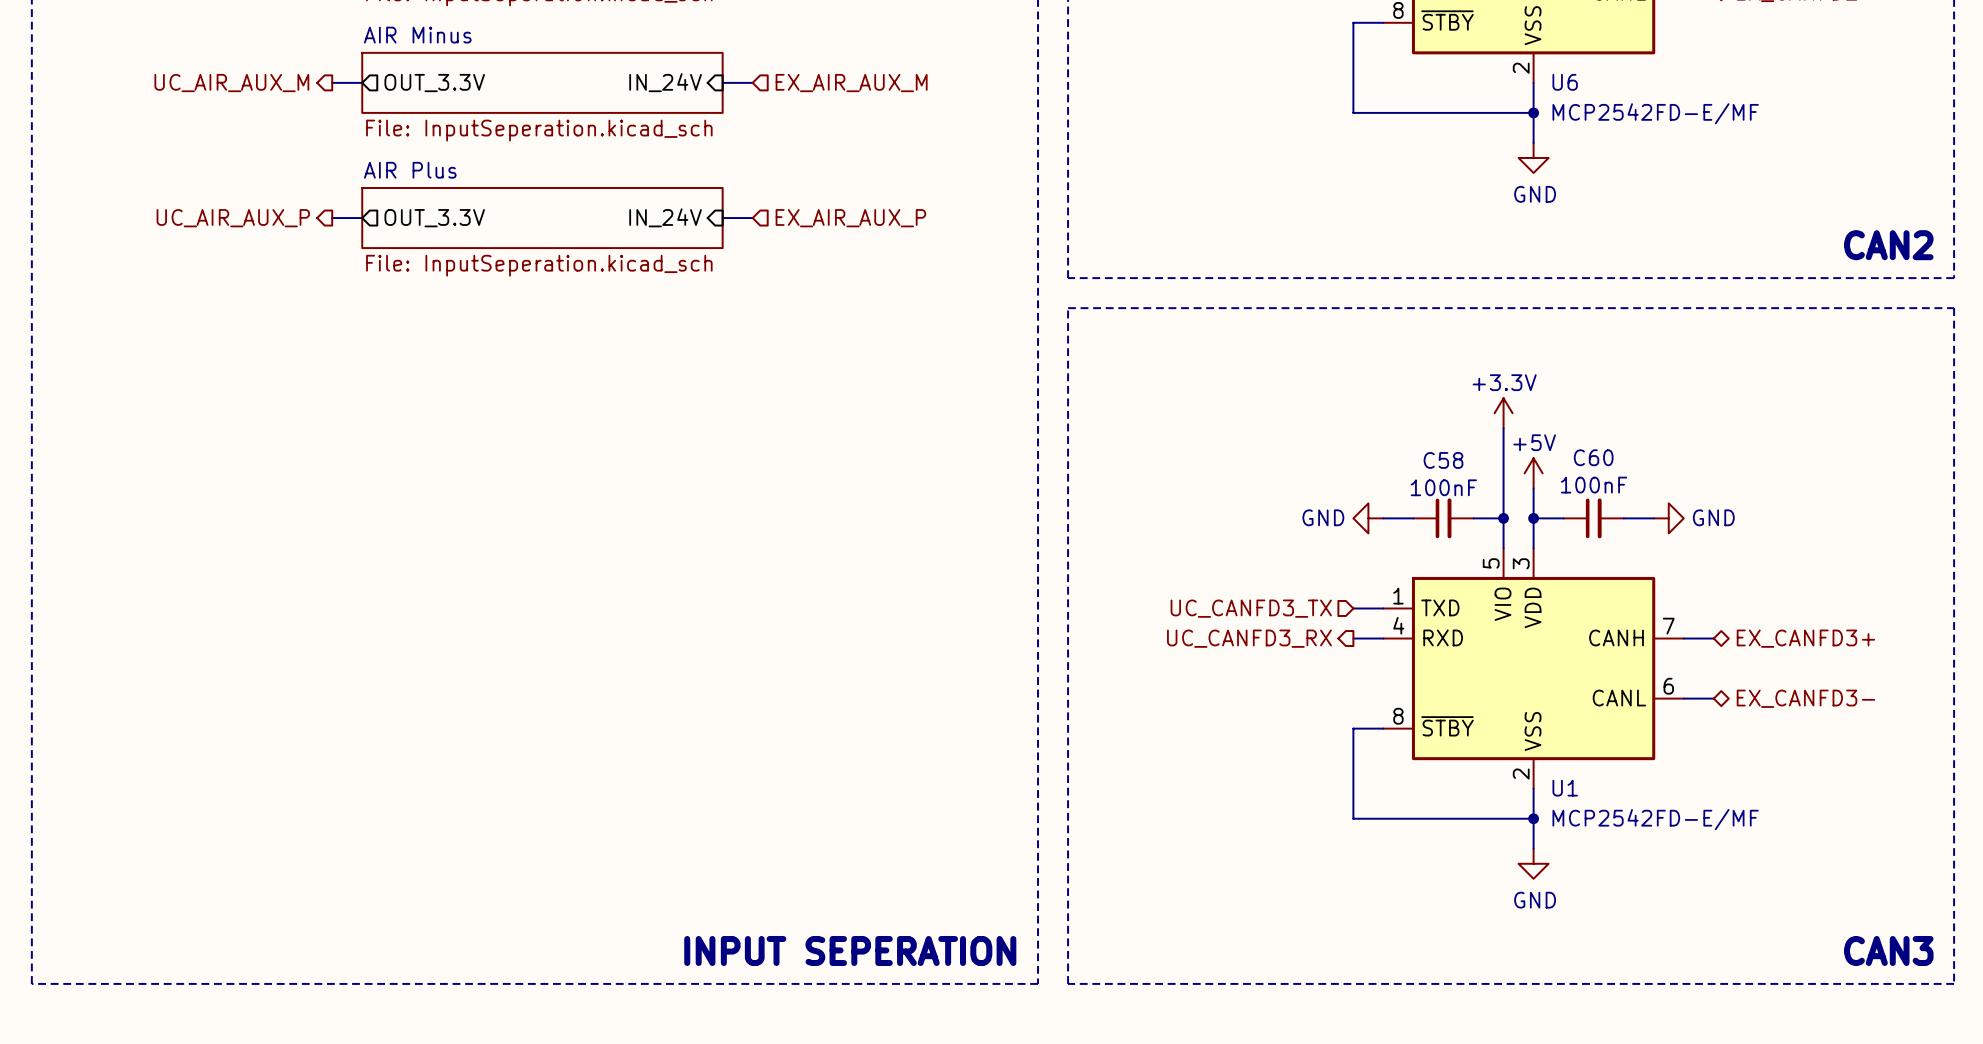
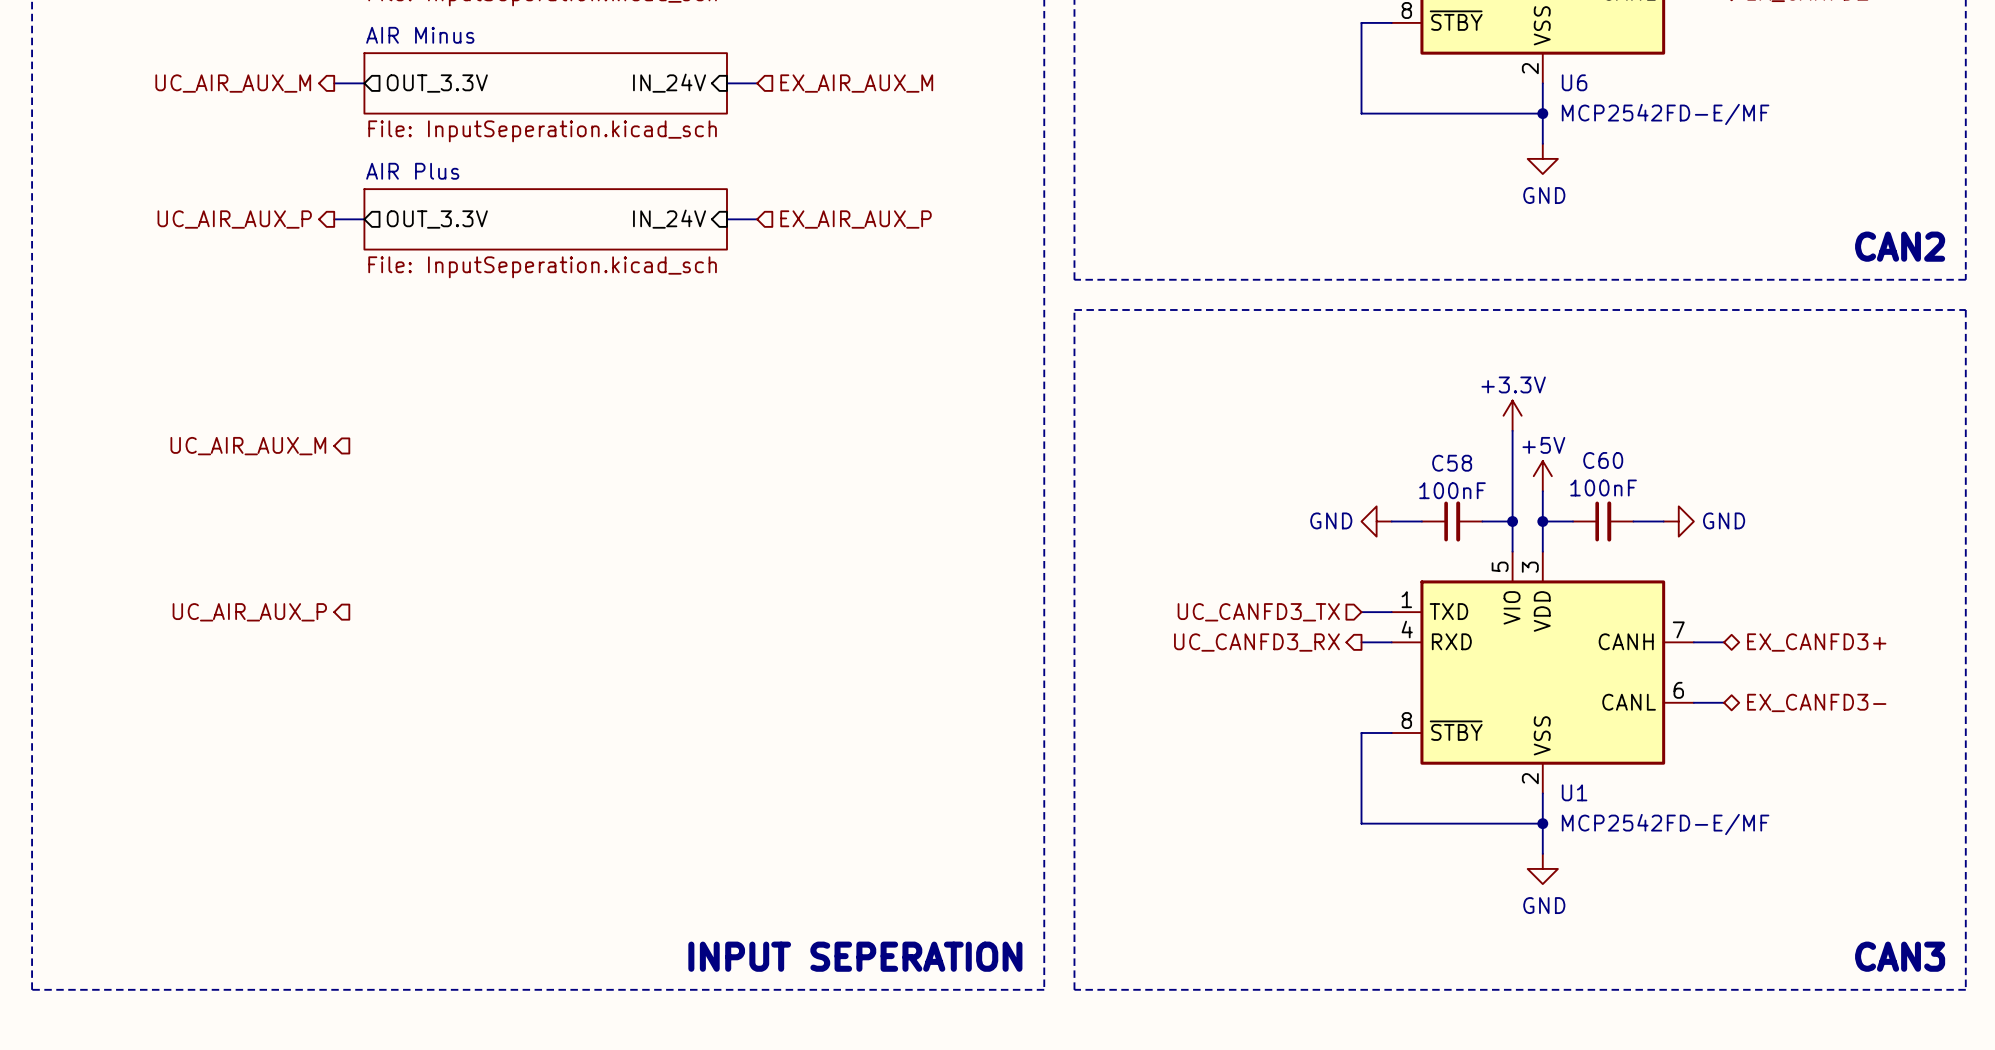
hierarchical label: none -> UC_AIR_AUX_M (248, 446)
hierarchical label: none -> UC_AIR_AUX_P (249, 612)

